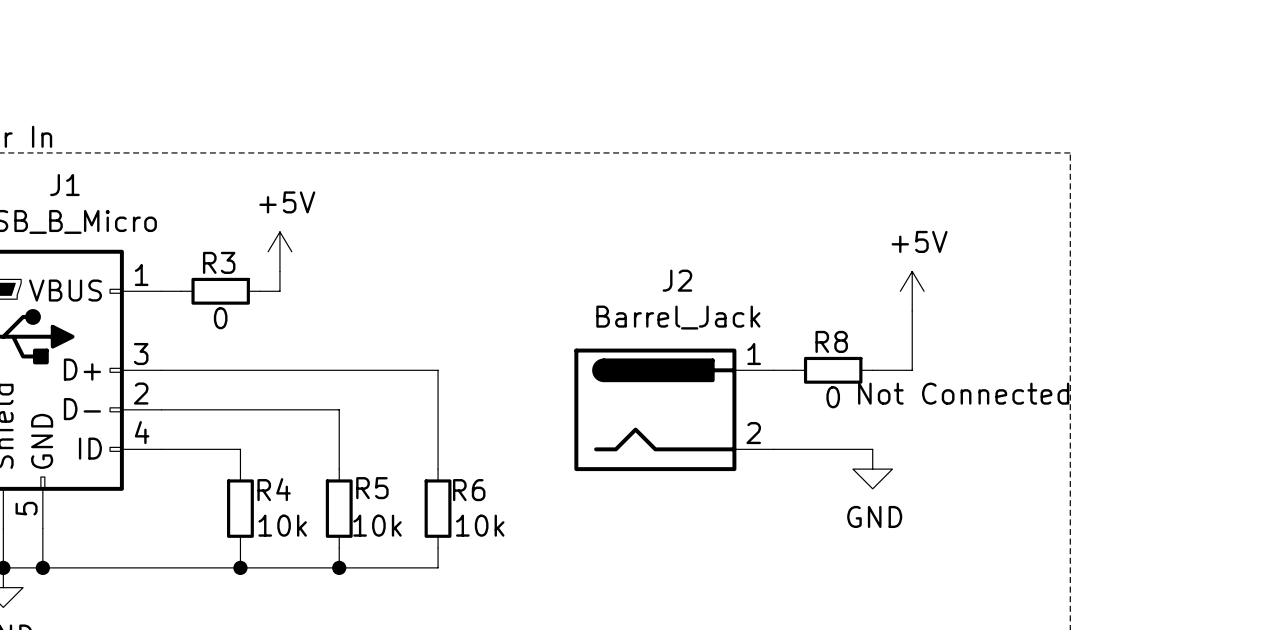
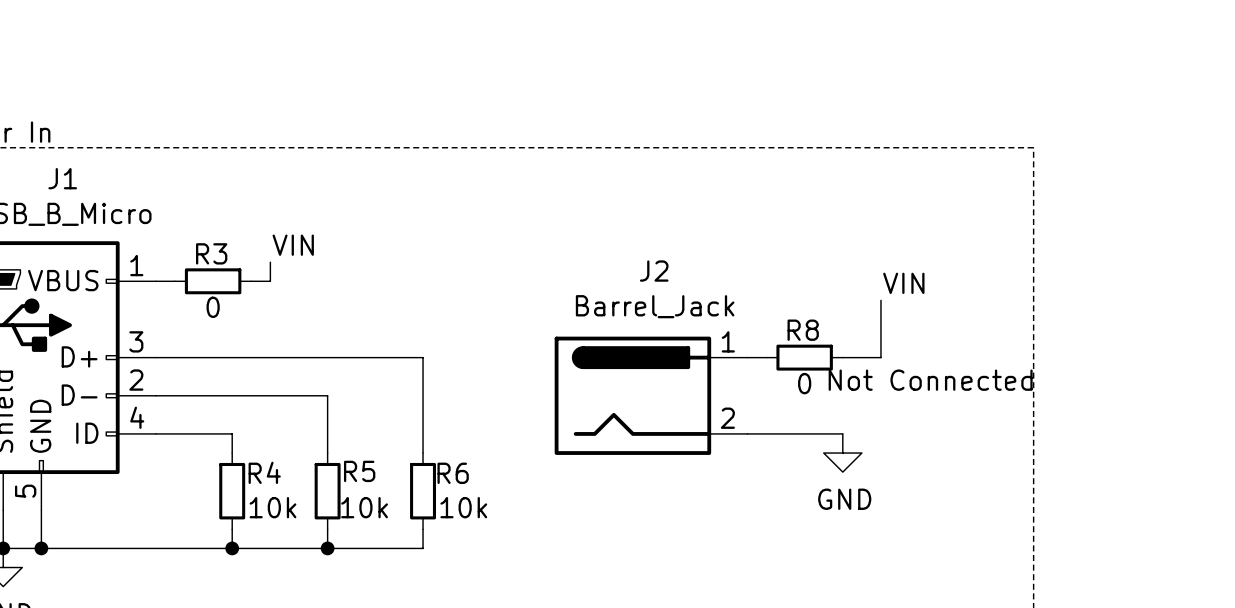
power symbol: +5V (279, 251) -> none
label: none -> VIN (293, 245)
power symbol: +5V (912, 291) -> none
label: none -> VIN (903, 283)

